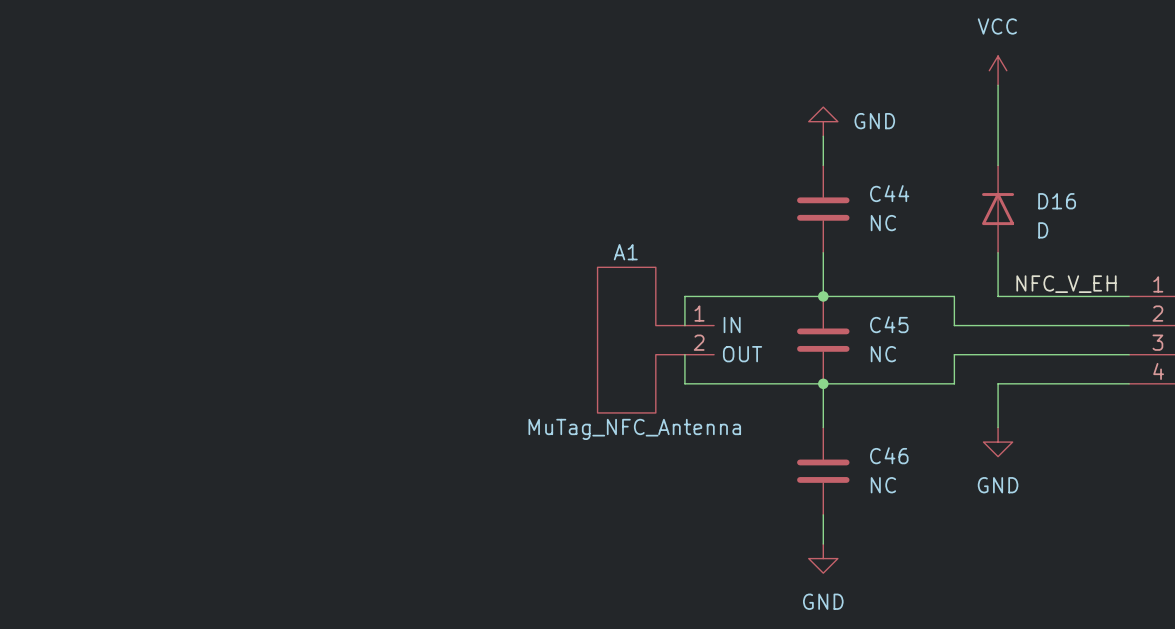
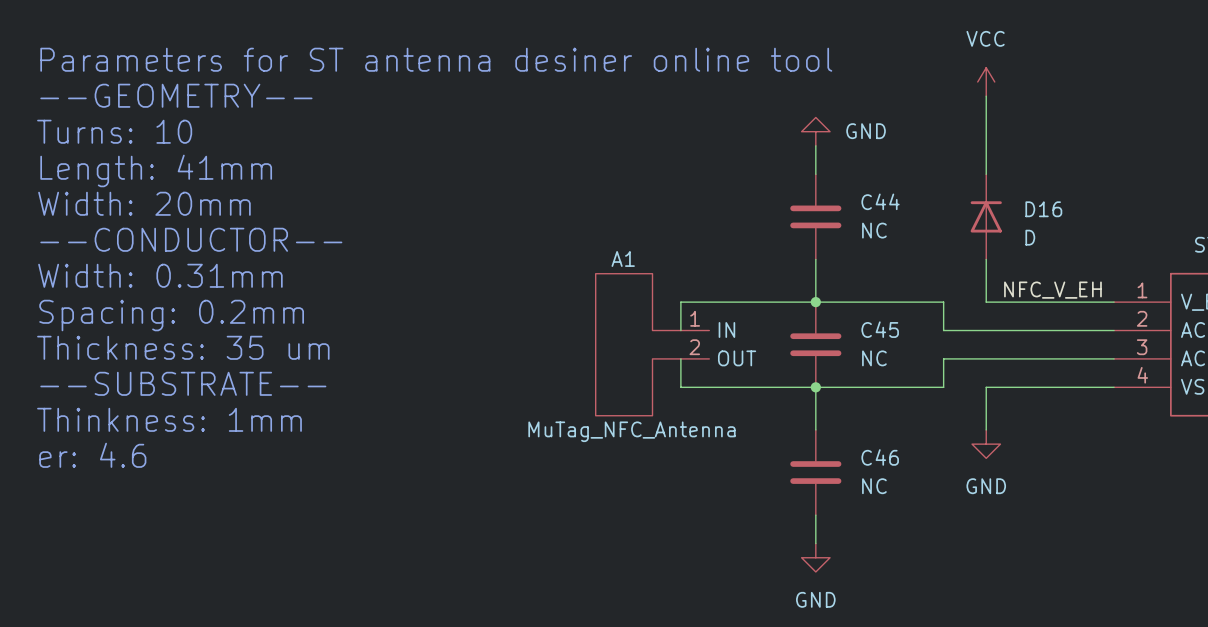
text: none -> Parameters for ST antenna desiner online tool (436, 59)
text: none -> --GEOMETRY-- (176, 95)
text: none -> Turns: 10 (114, 131)
text: none -> Length: 41mm (156, 170)
text: none -> Width: 20mm (144, 203)
text: none -> --CONDUCTOR-- (191, 239)
text: none -> Width: 0.31mm (160, 275)
text: none -> Spacing: 0.2mm (171, 315)
text: none -> Thickness: 35 um (183, 347)
text: none -> --SUBSTRATE-- (183, 383)
text: none -> Thinkness: 1mm (169, 419)
text: none -> er: 4.6 (92, 455)

